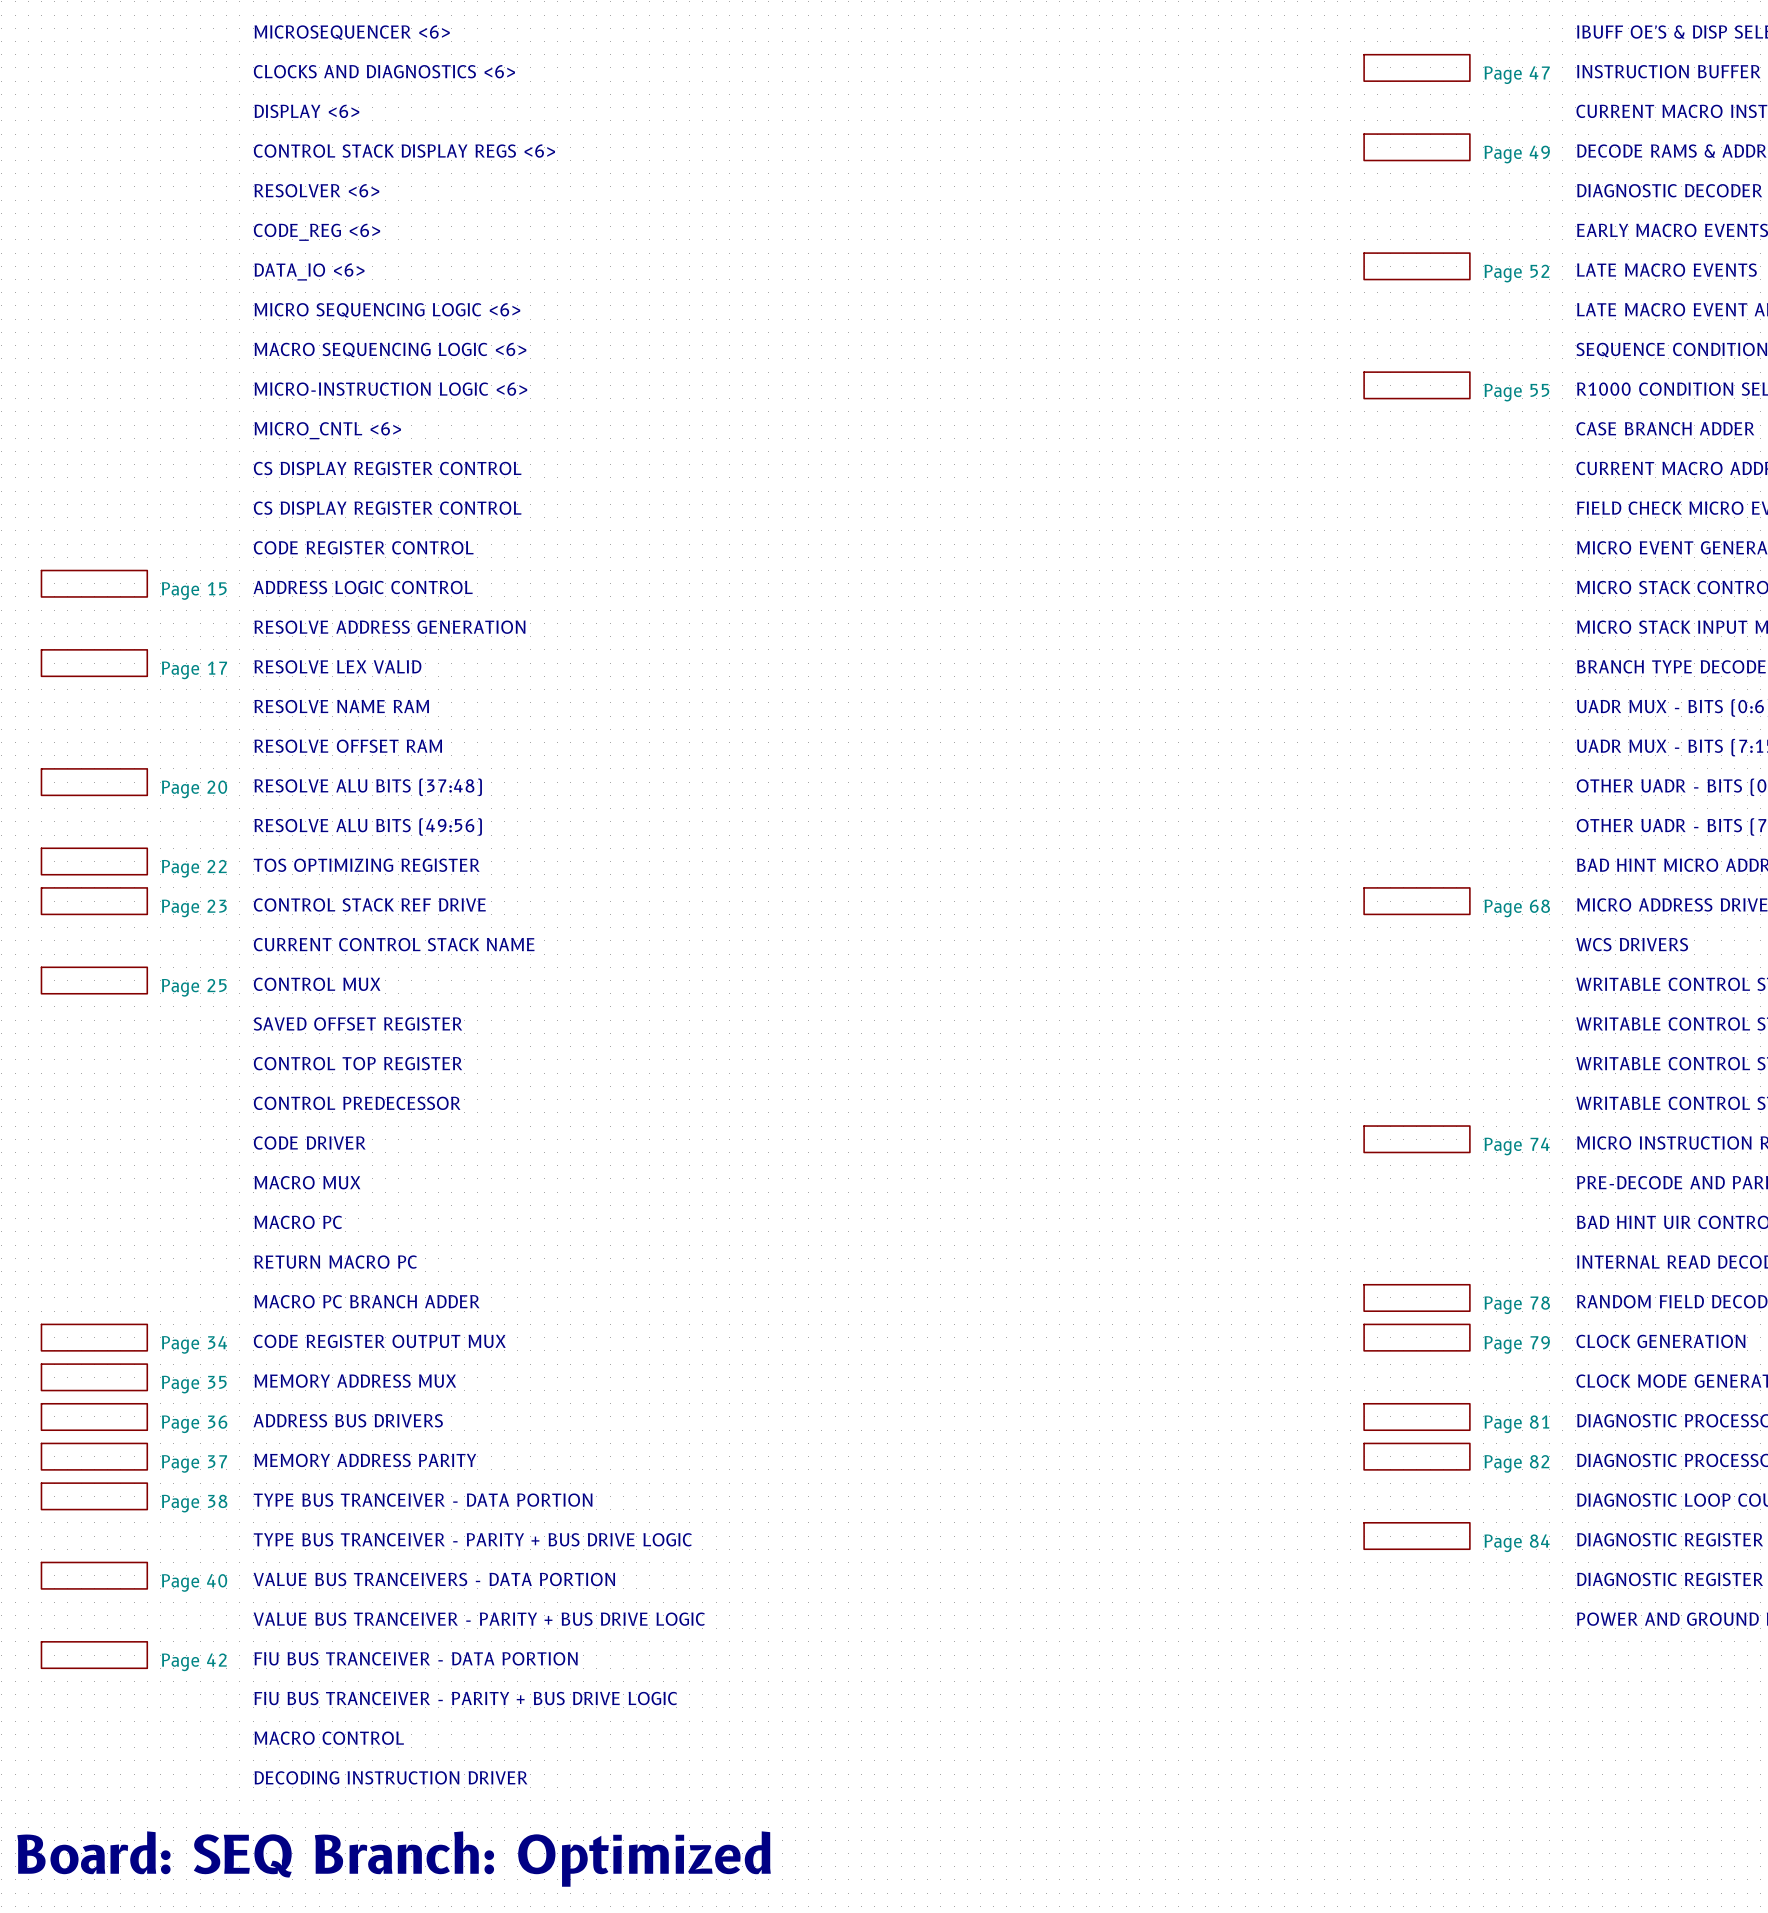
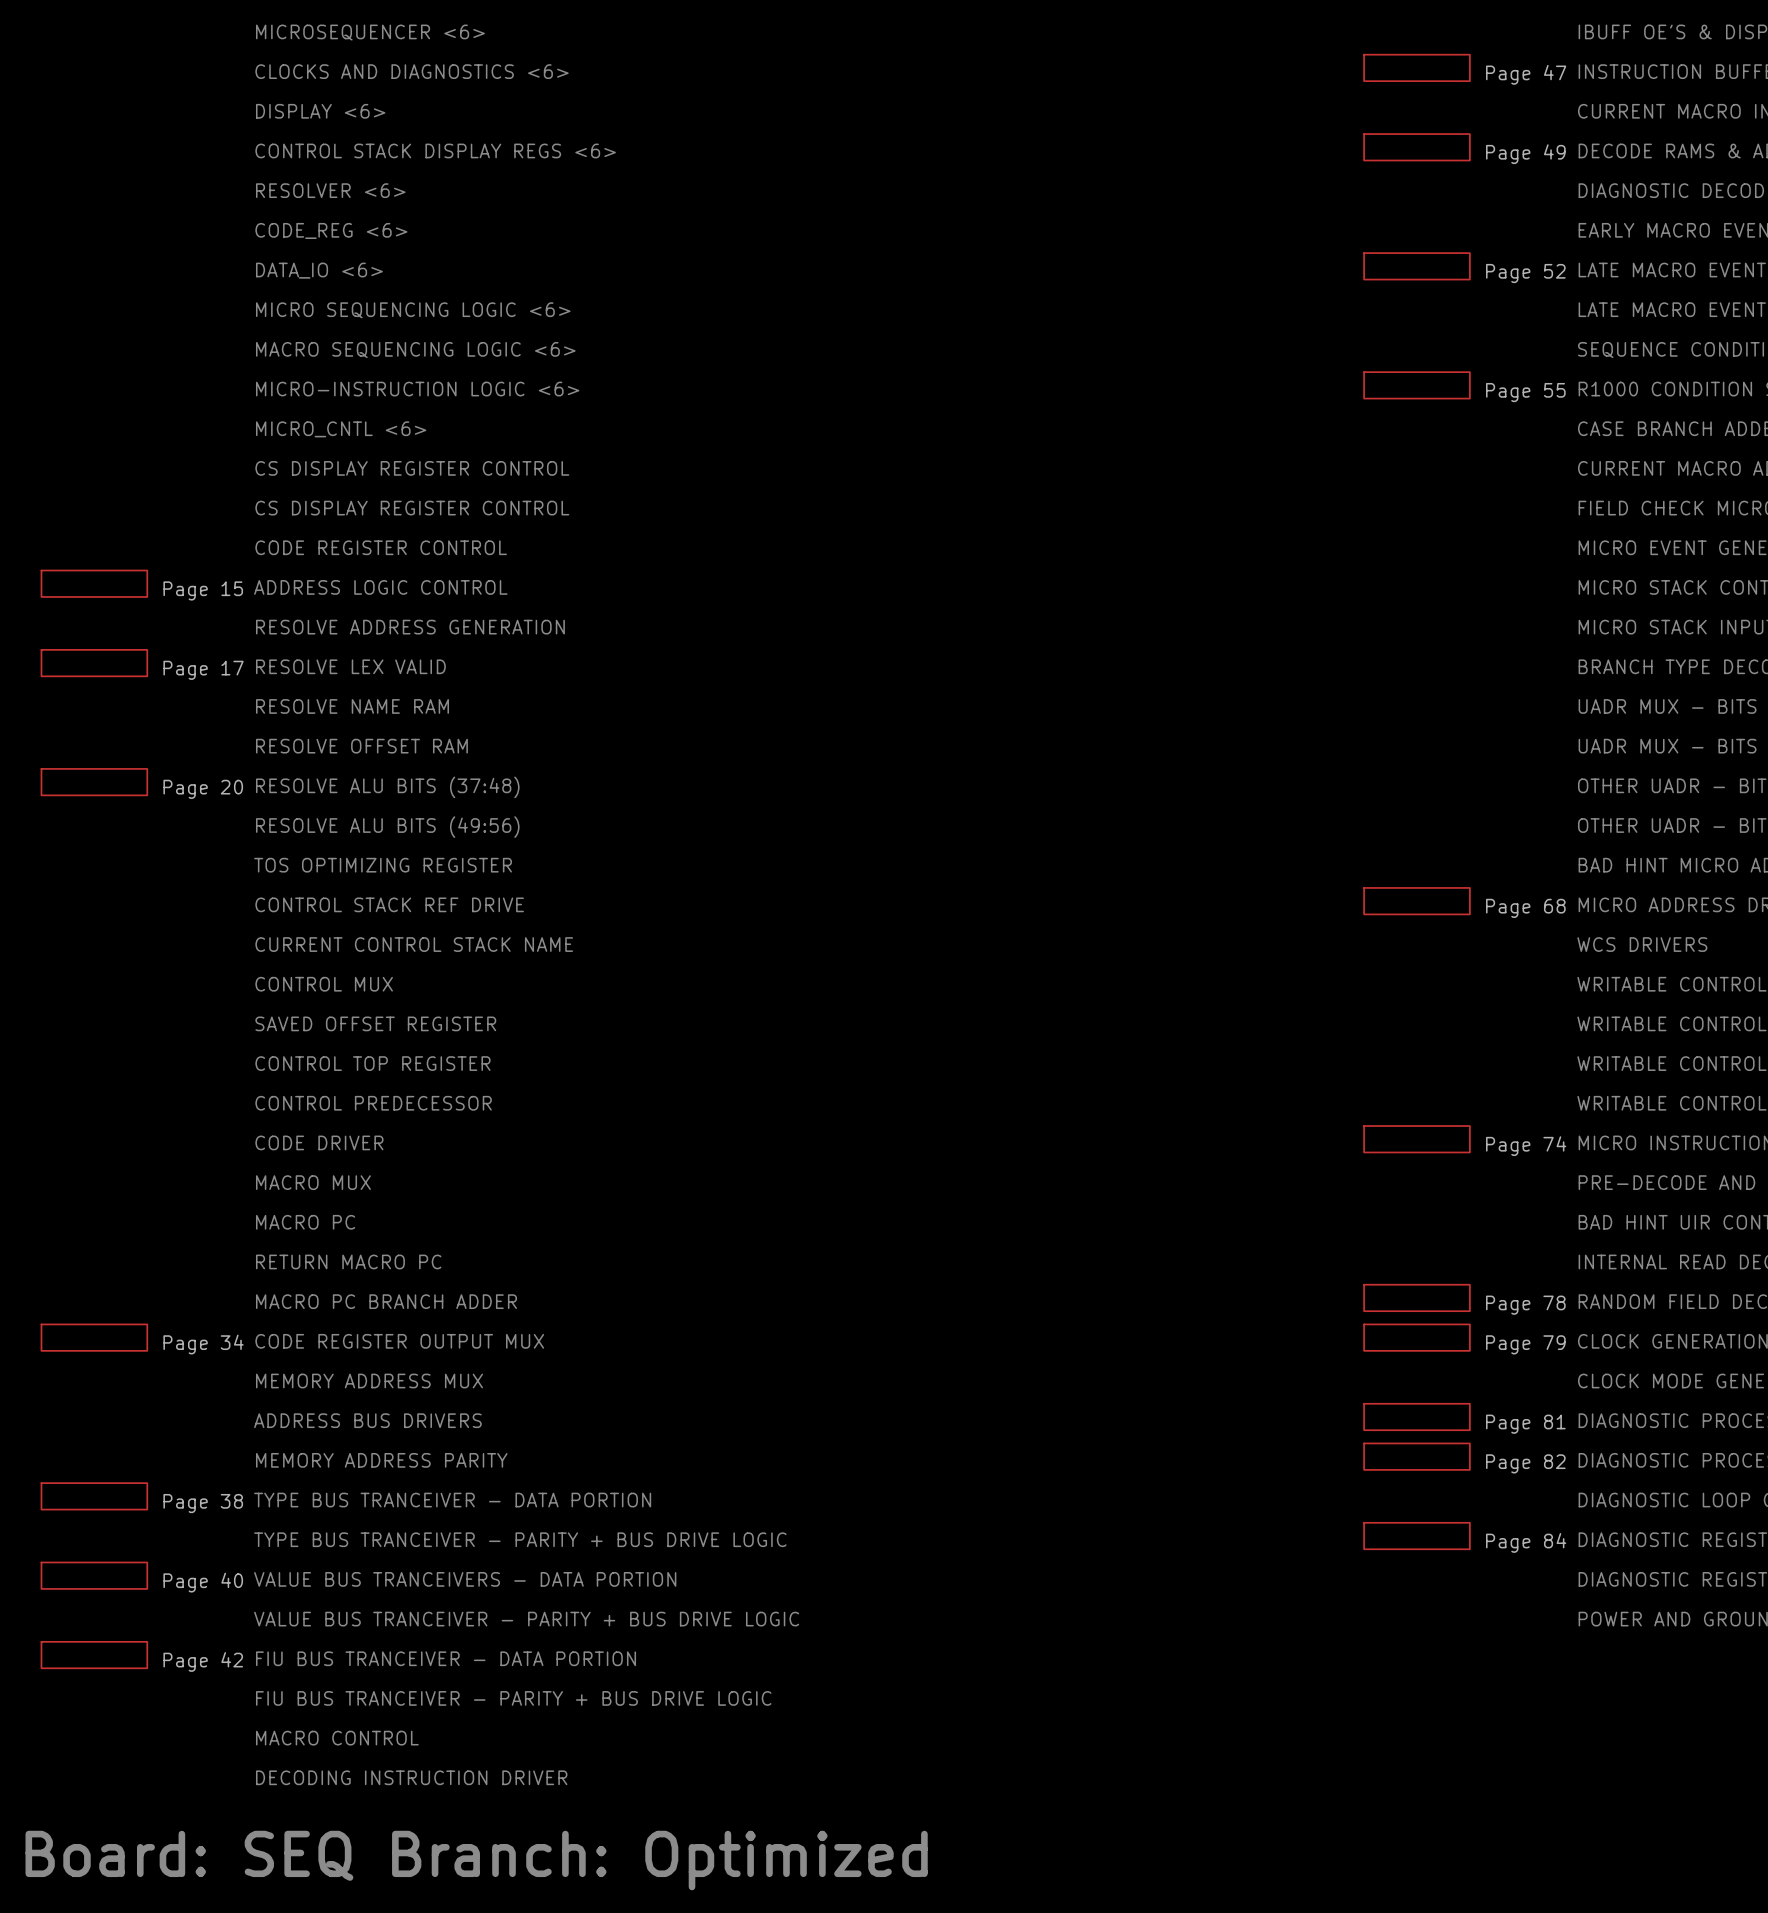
sheet Page 22: (94, 861) -> none
sheet Page 23: (94, 901) -> none
sheet Page 25: (94, 980) -> none
sheet Page 35: (94, 1377) -> none
sheet Page 36: (94, 1416) -> none
sheet Page 37: (94, 1456) -> none

